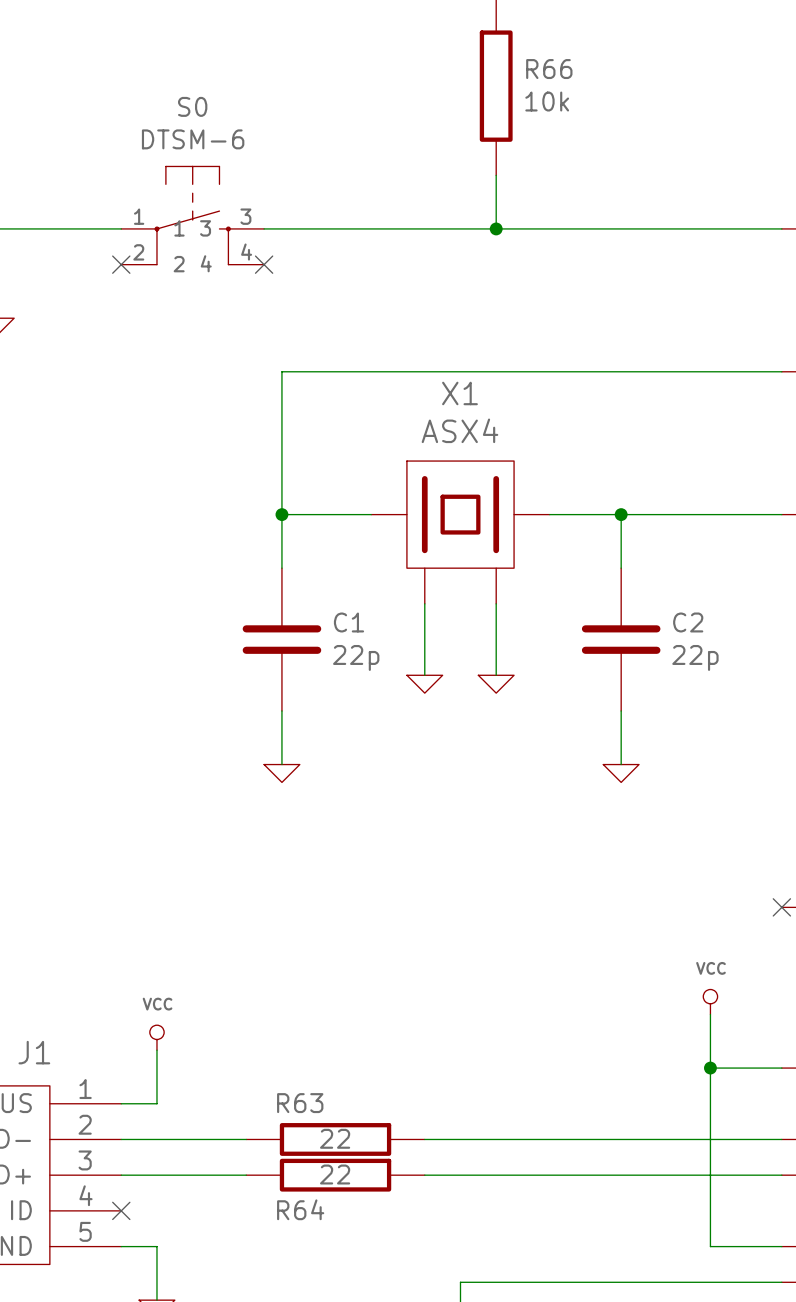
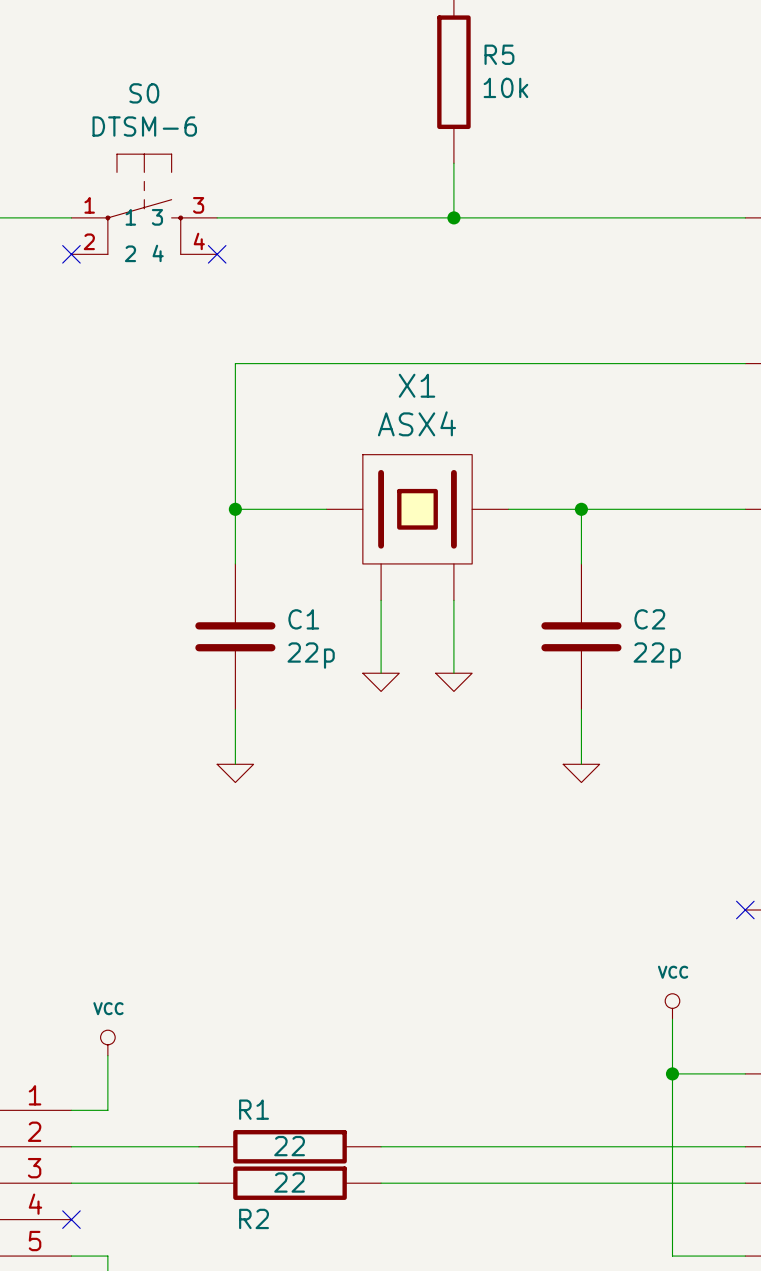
R66 name: R66 (549, 69) -> R5 (499, 54)
R63 name: R63 (300, 1103) -> R1 (254, 1109)
R64 name: R64 (300, 1209) -> R2 (254, 1218)

